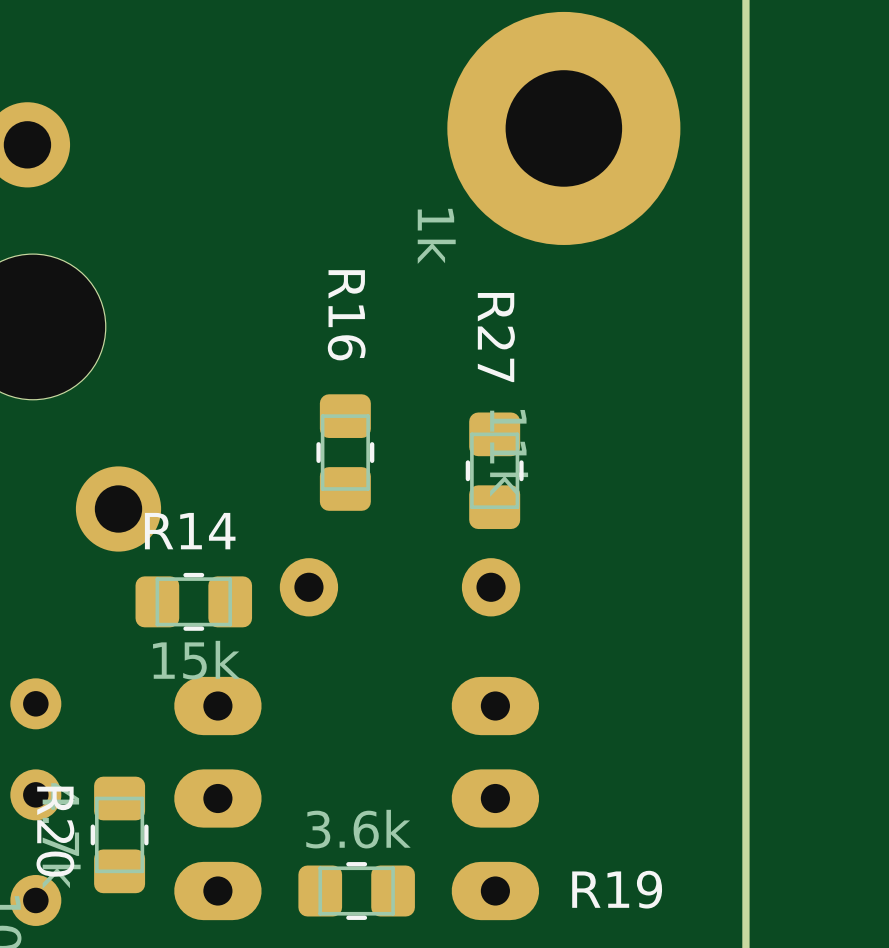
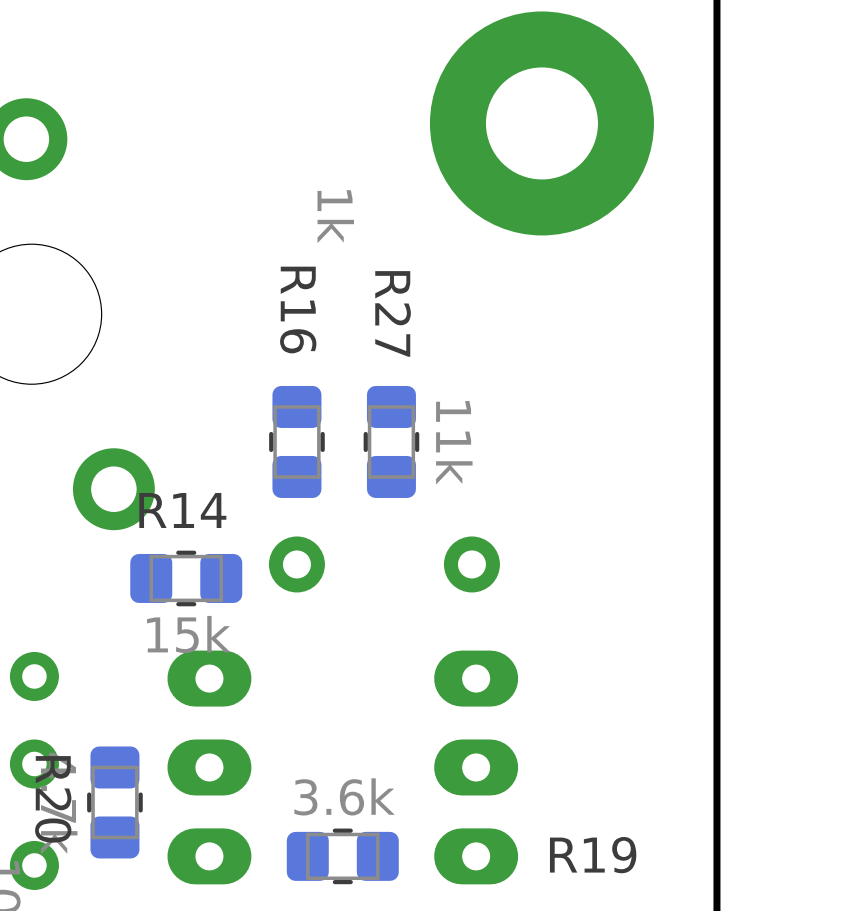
R16 position: (345, 452) -> (296, 441)
R27 position: (494, 470) -> (391, 441)

